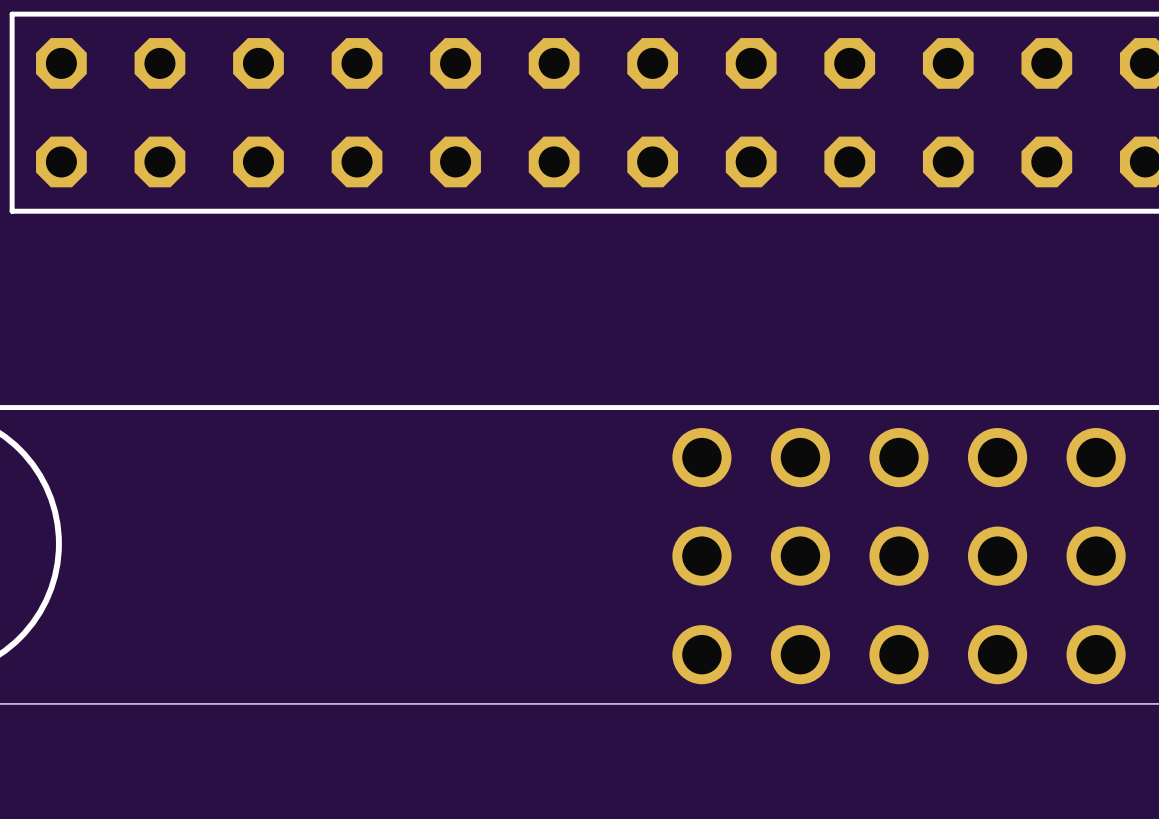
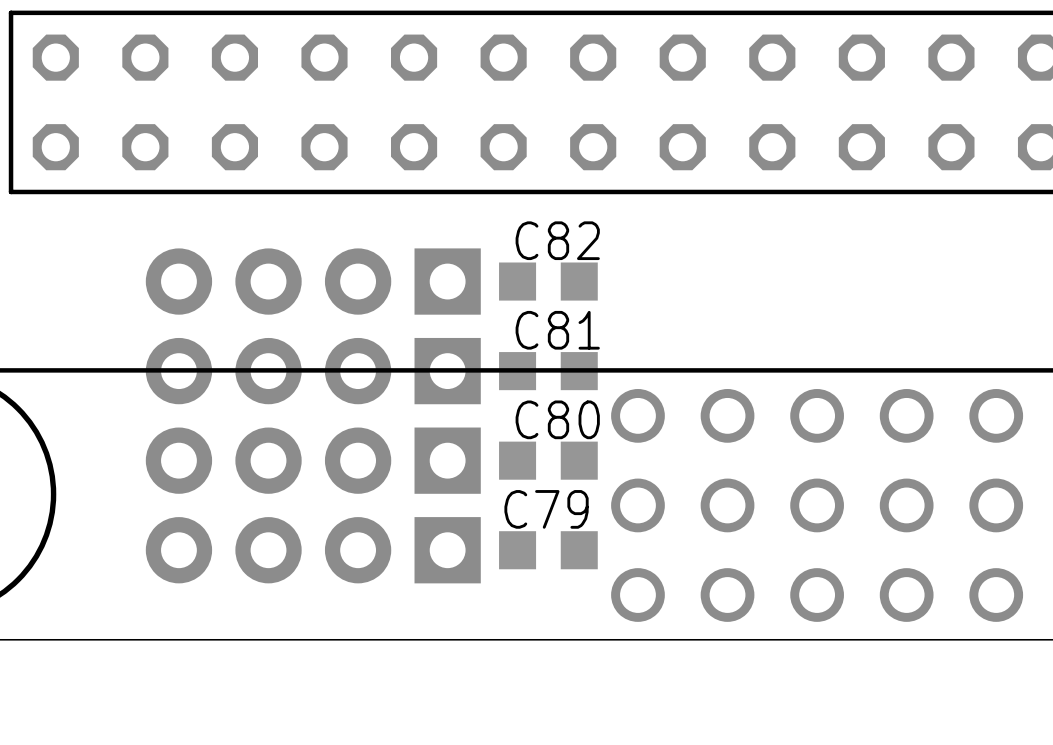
part: none -> (313, 281)
C82: none -> (548, 281)
part: none -> (313, 371)
C81: none -> (548, 371)
part: none -> (313, 460)
C80: none -> (548, 460)
part: none -> (313, 550)
C79: none -> (548, 550)

